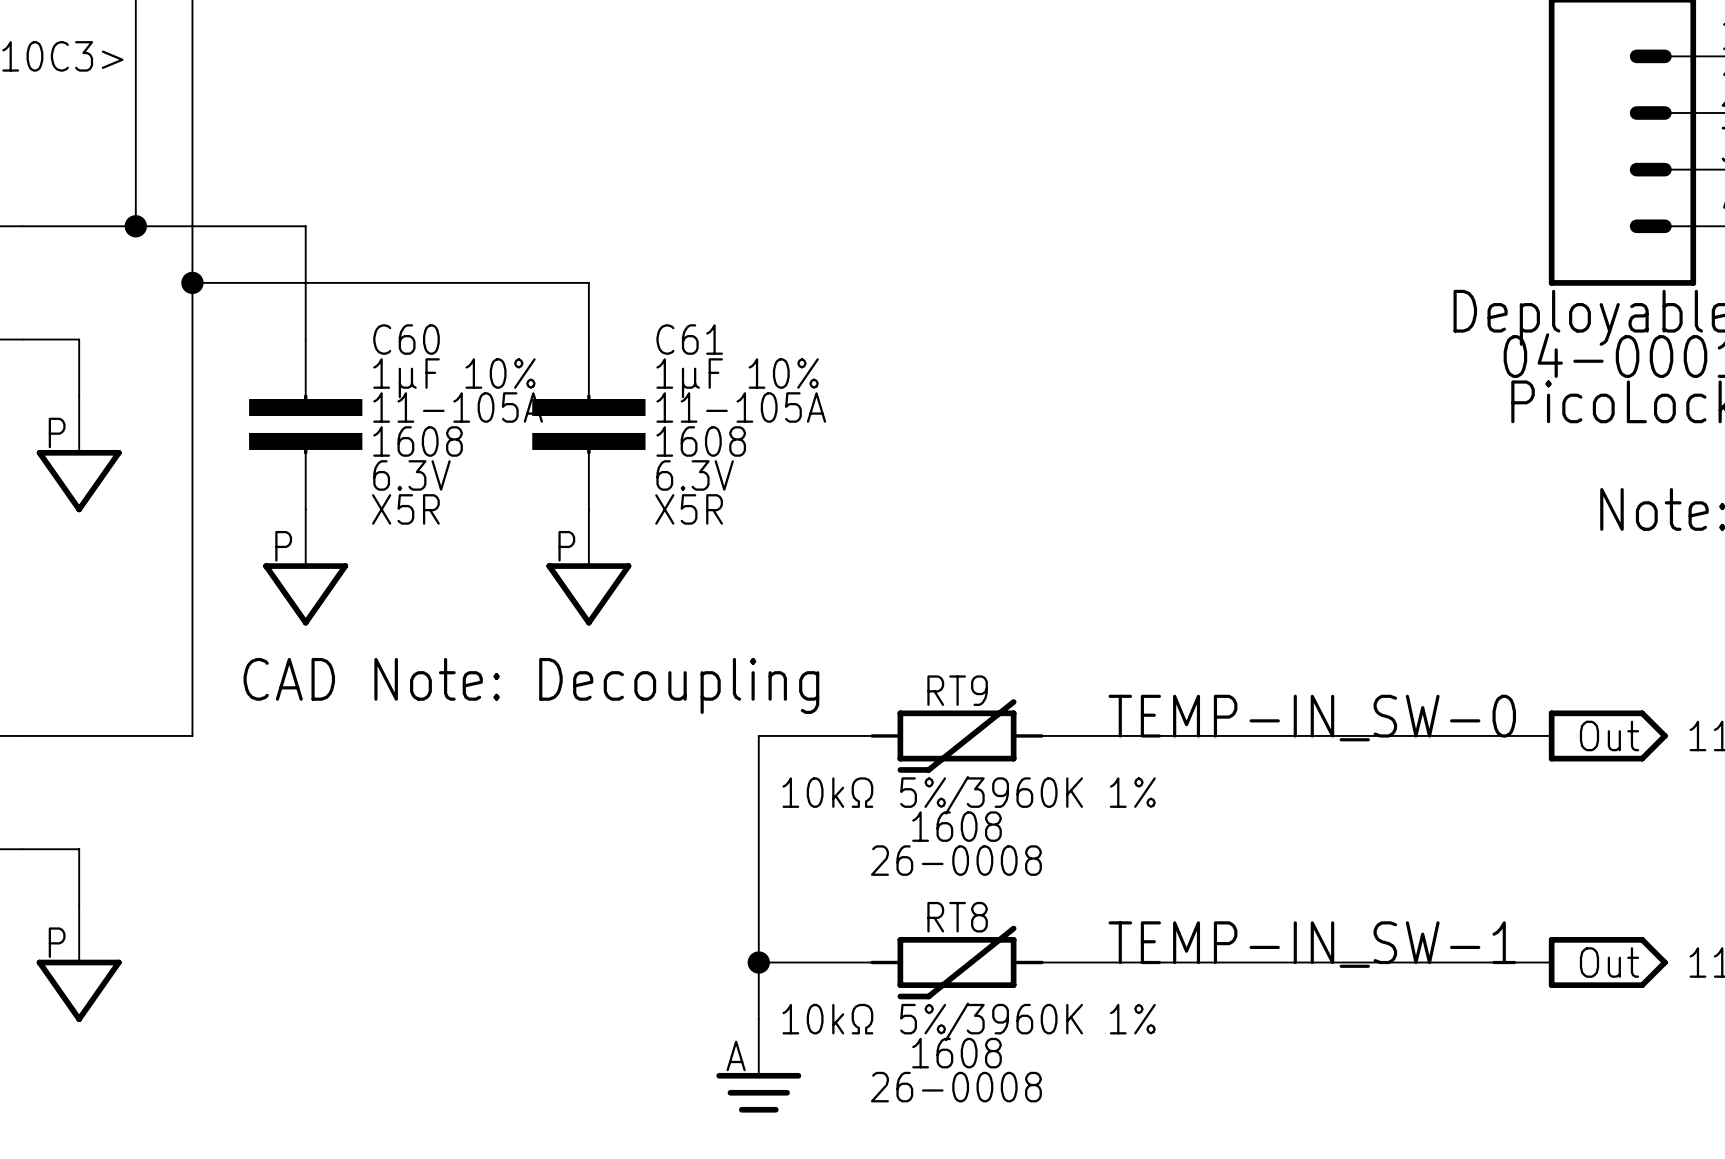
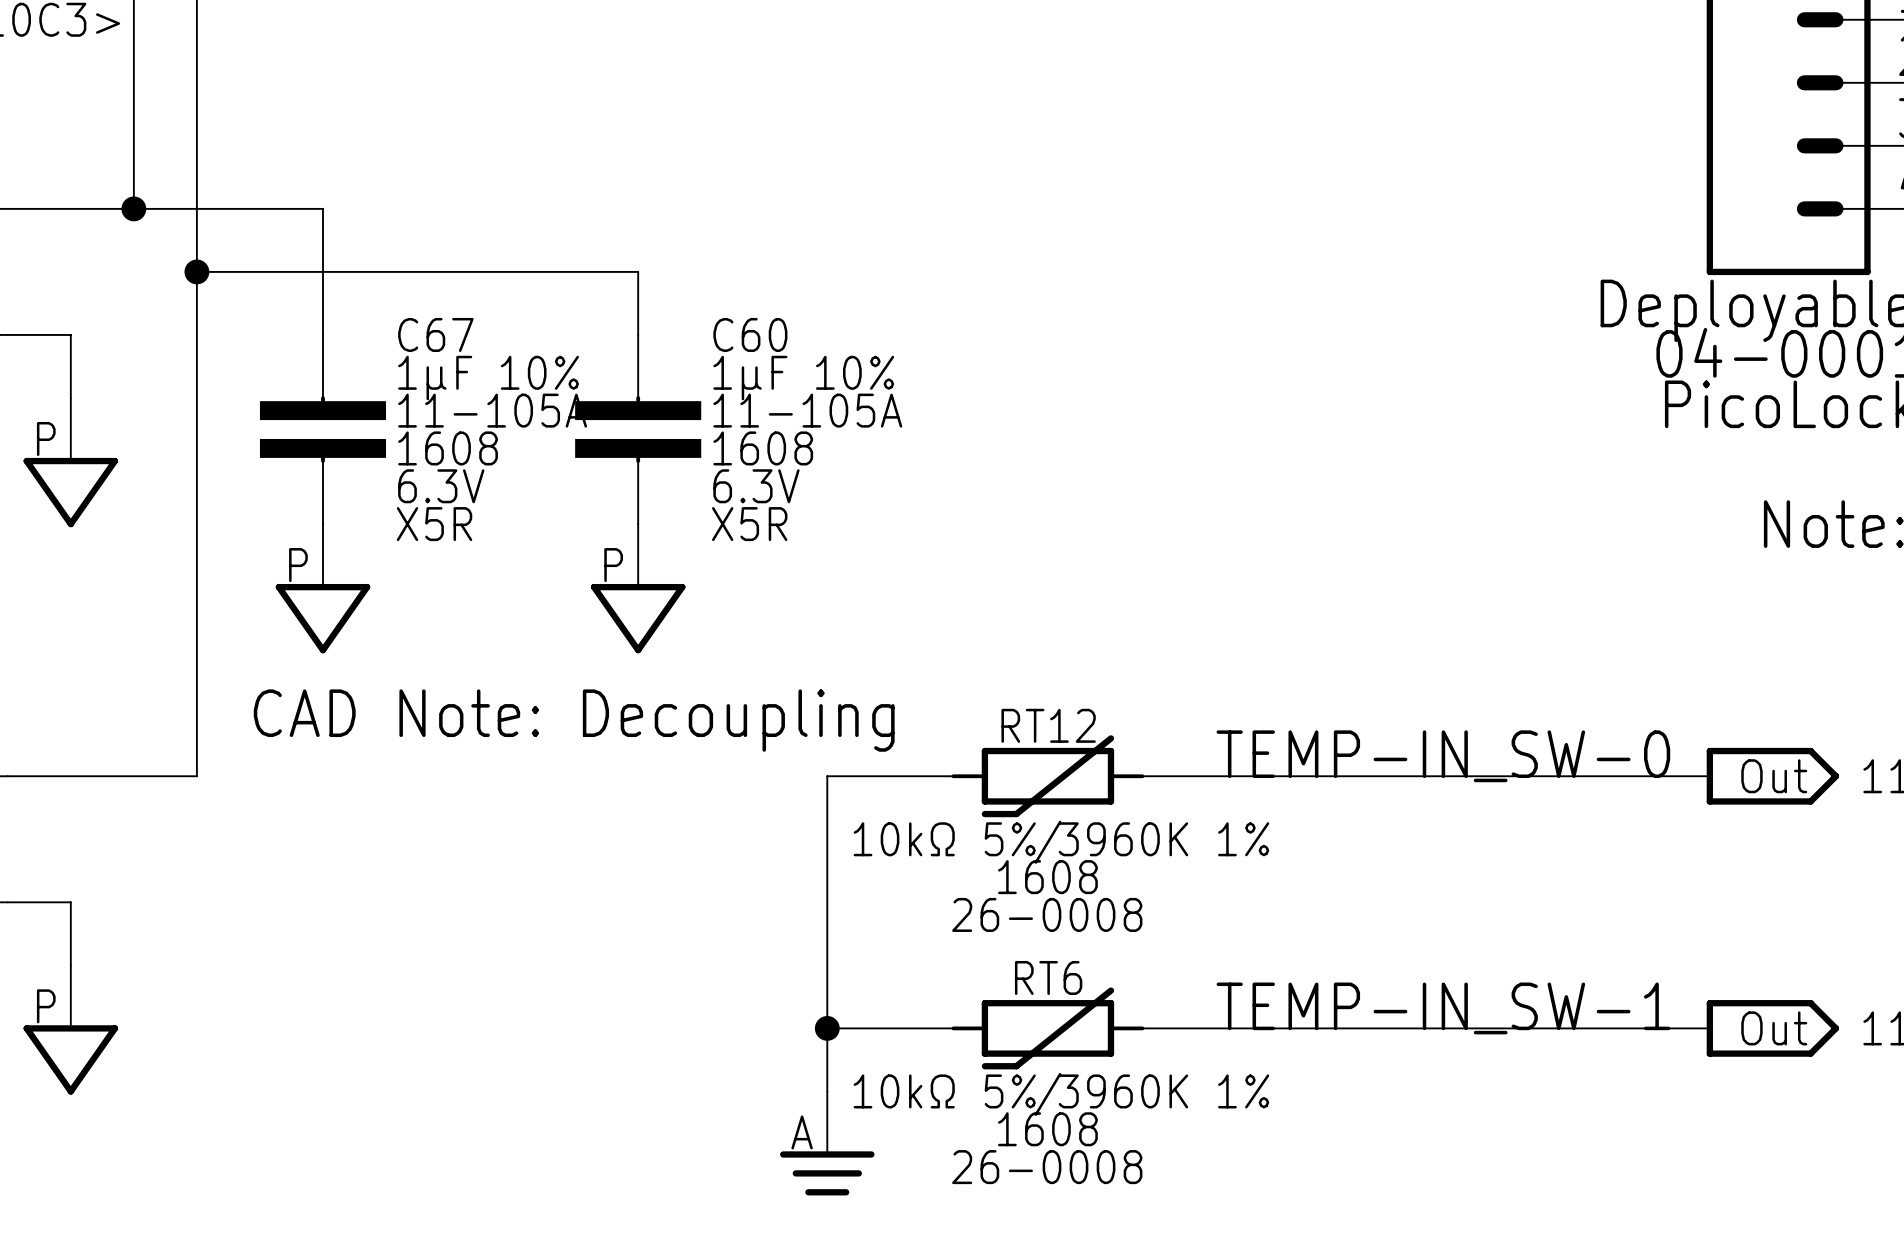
C60 name: C60 (406, 339) -> C67 (435, 334)
C61 name: C61 (689, 339) -> C60 (750, 334)
RT9 name: RT9 (957, 690) -> RT12 (1048, 725)
RT8 name: RT8 (957, 917) -> RT6 (1048, 977)

